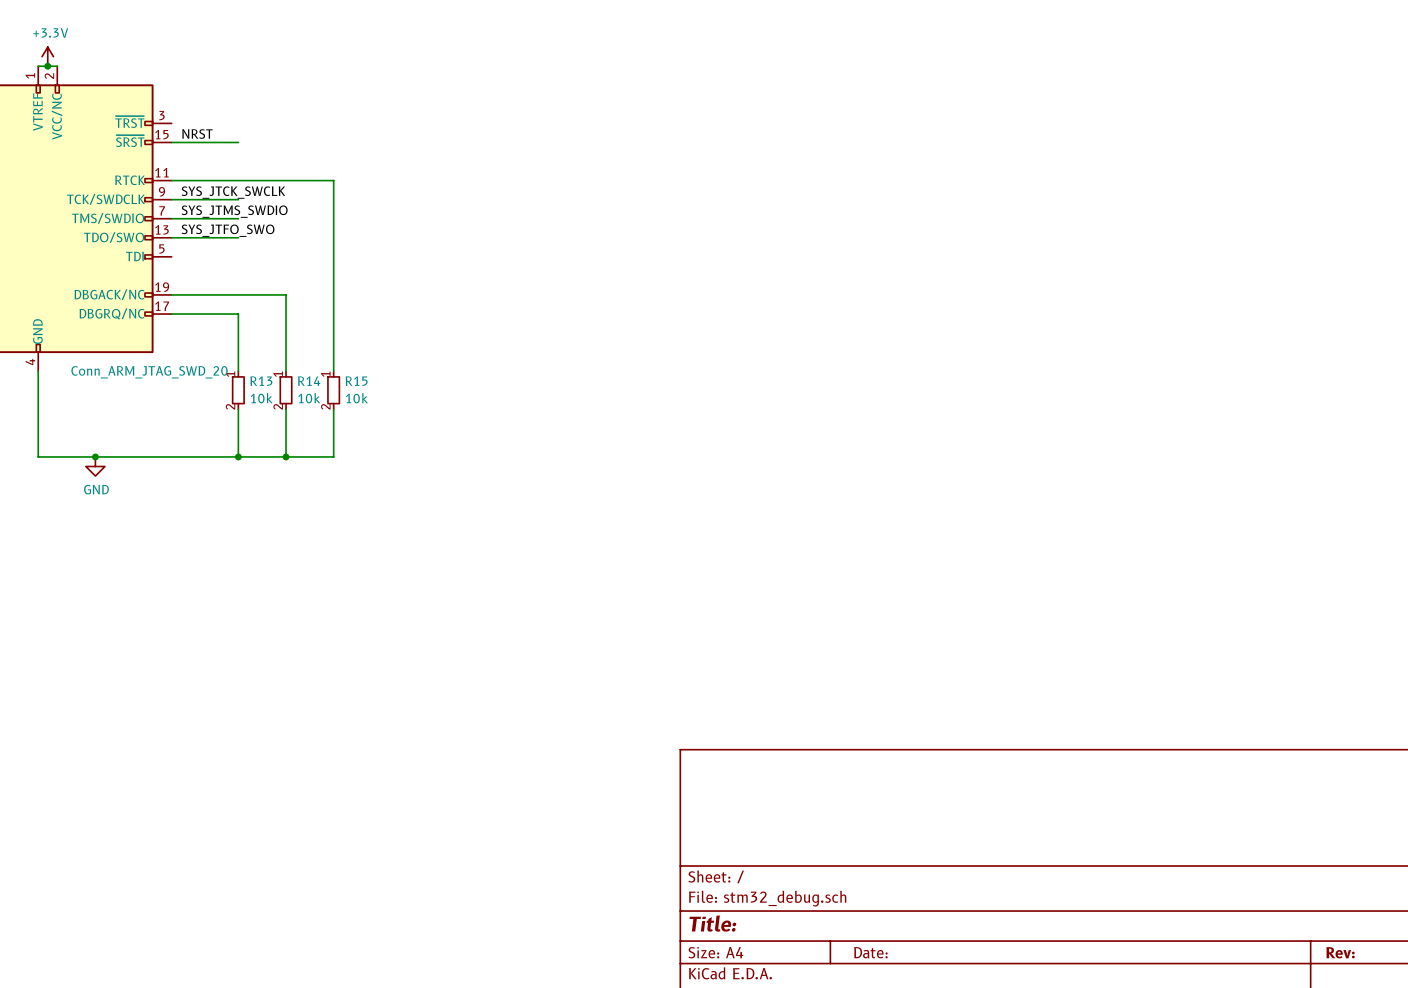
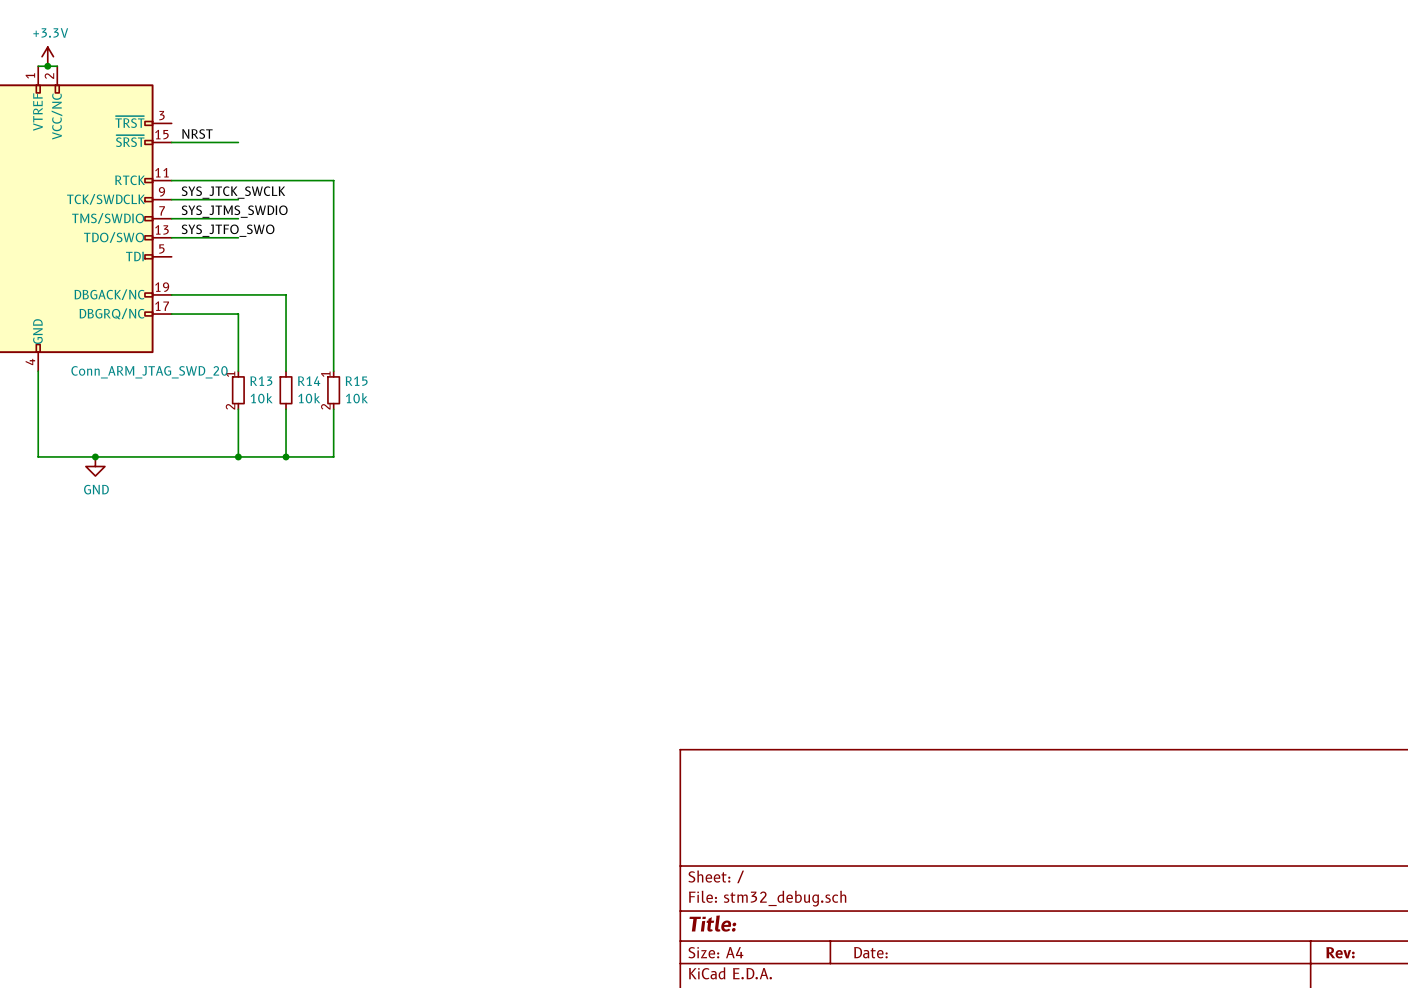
R14 pin number: 1 (278, 374) -> none
R14 pin number: 2 (278, 406) -> none

